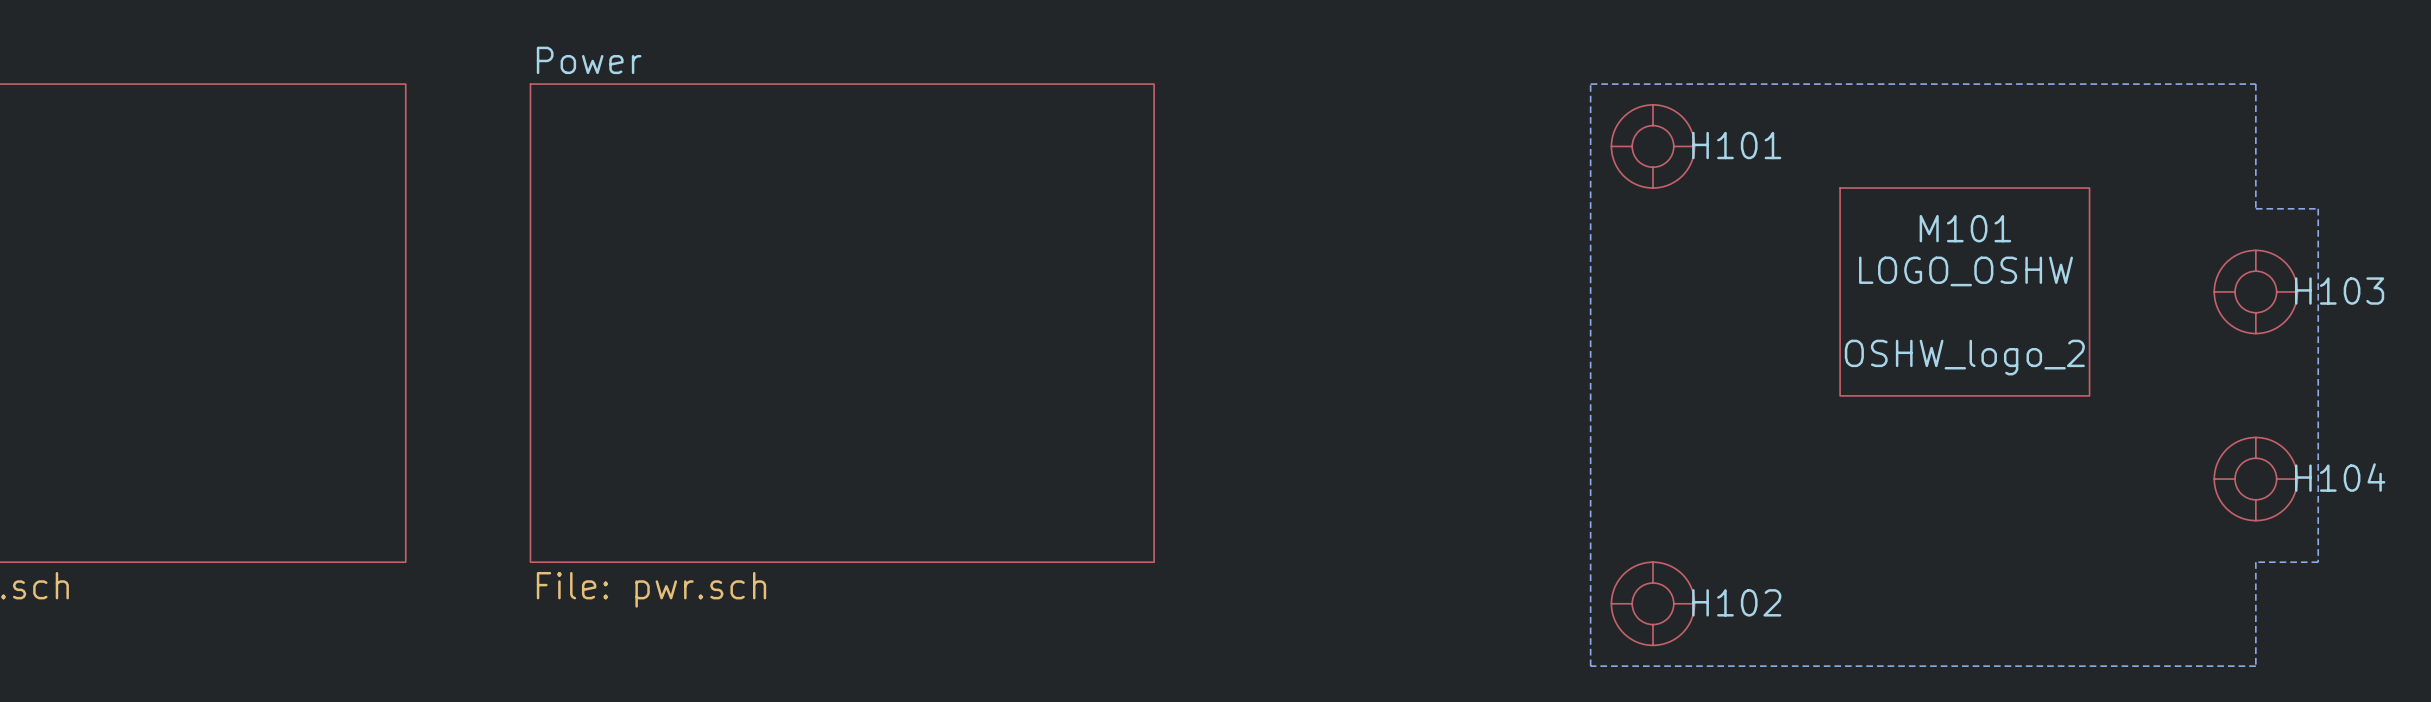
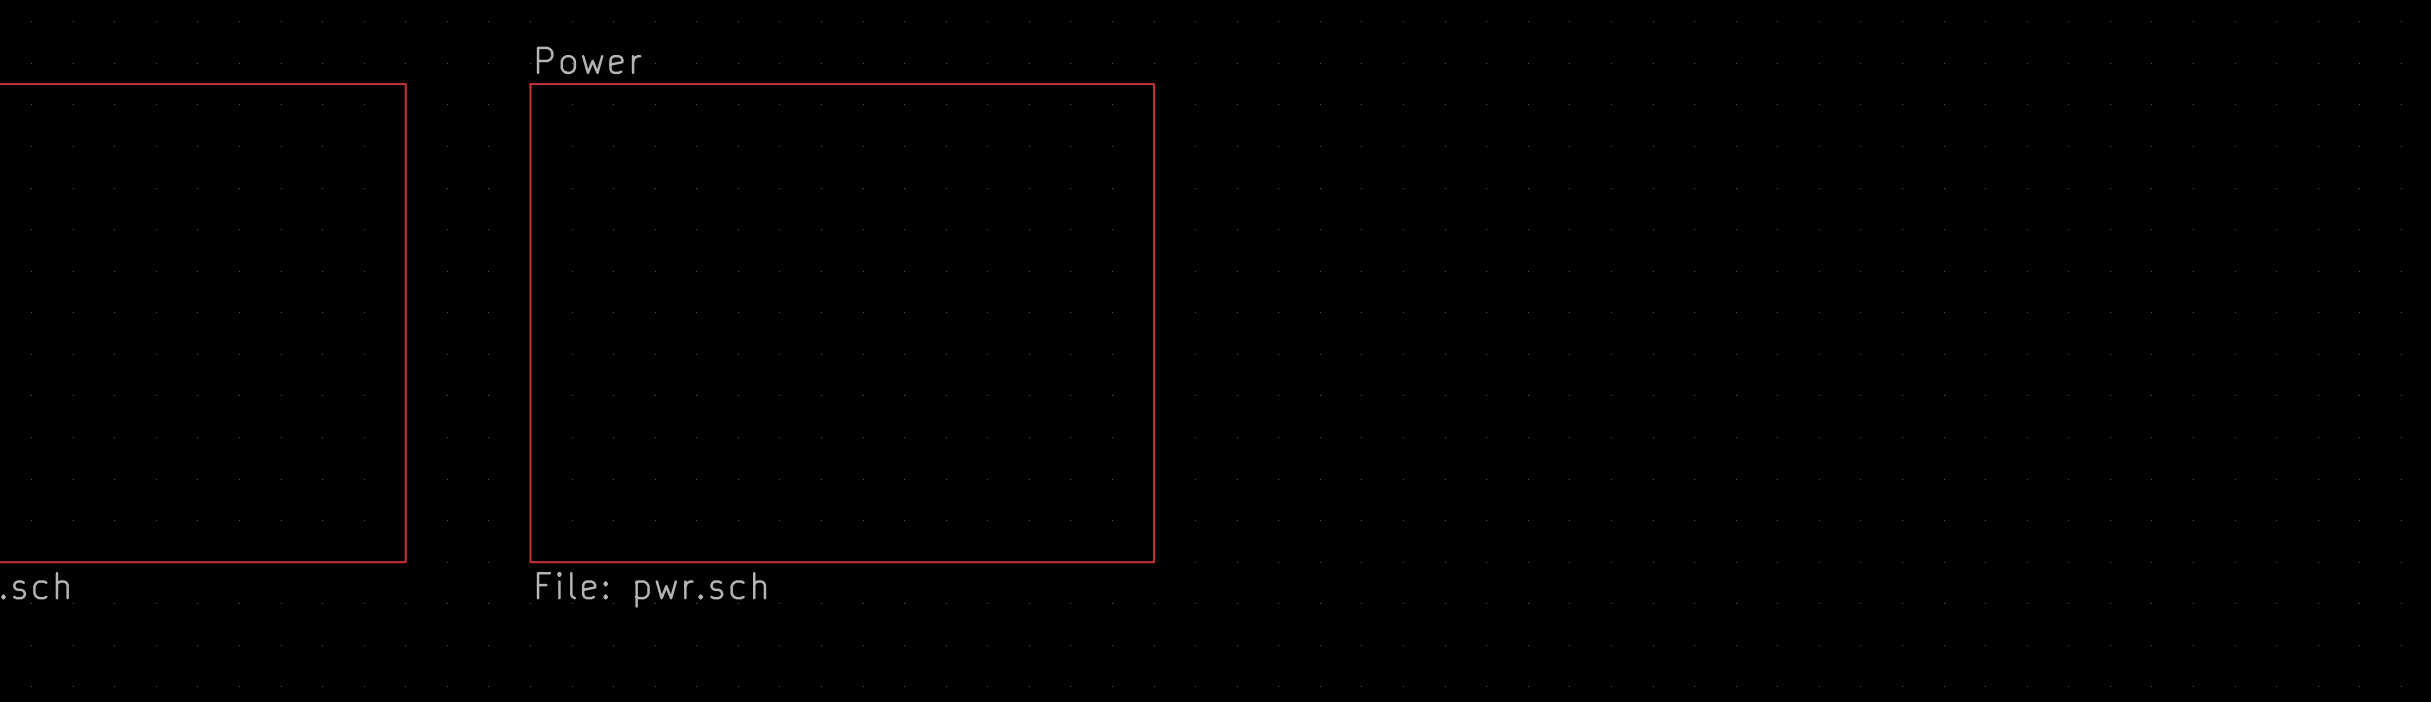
line: (1590, 84) (2255, 84) (2255, 208) (2318, 208) (2318, 562) (2255, 562) (2255, 666) (1590, 666) (1590, 84) -> none
H101: (1653, 146) -> none
M101: LOGO_OSHW (1964, 291) -> none
H103: (2255, 291) -> none
H104: (2255, 479) -> none
H102: (1653, 603) -> none

